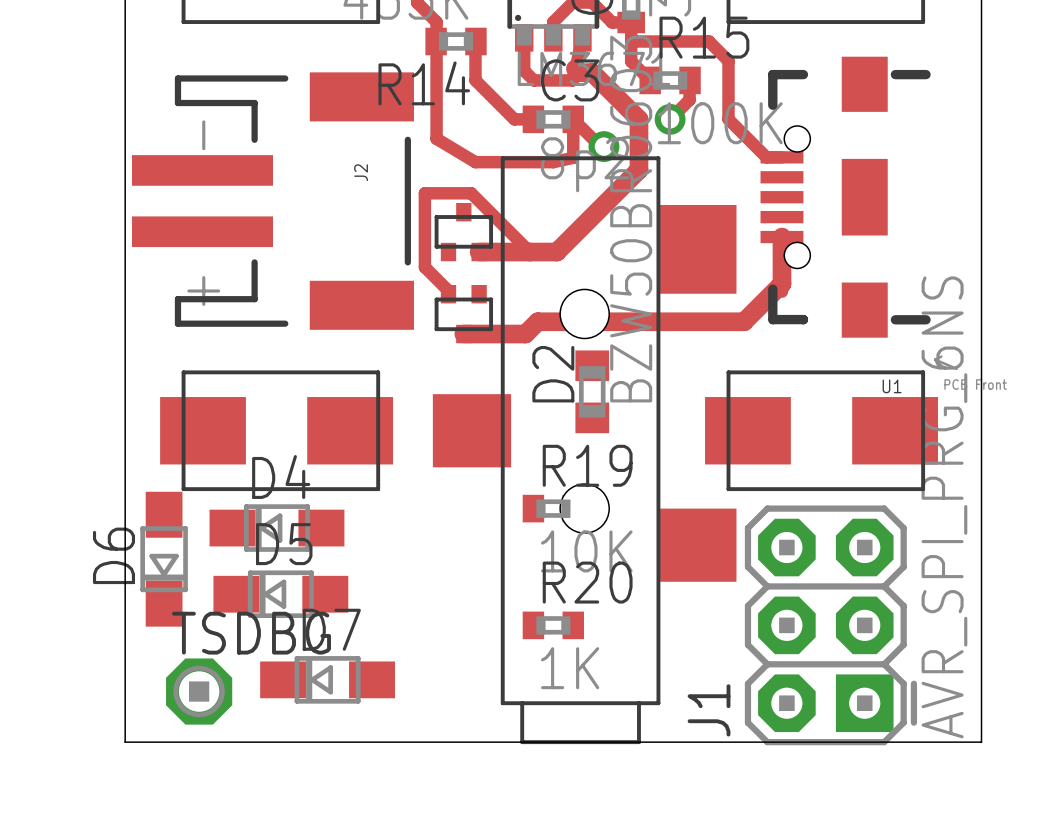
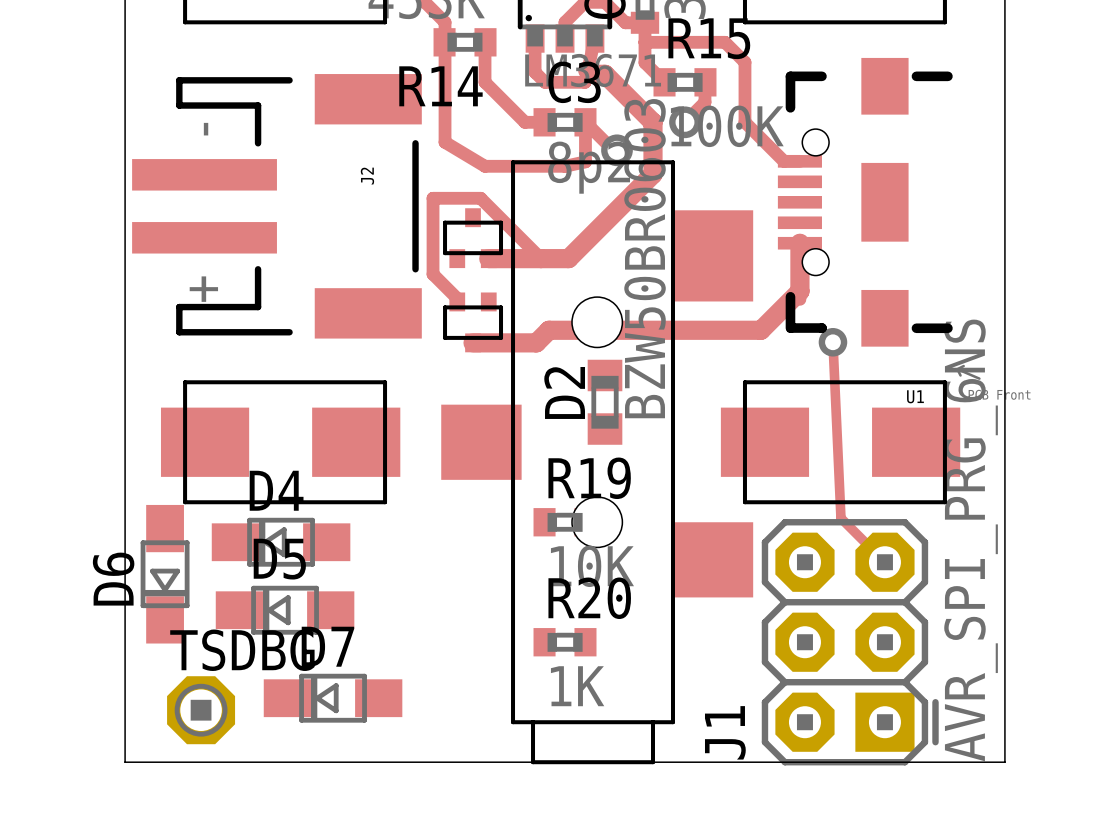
track: none -> (832, 342) (840, 518) (884, 562)
via: none -> (832, 342)

